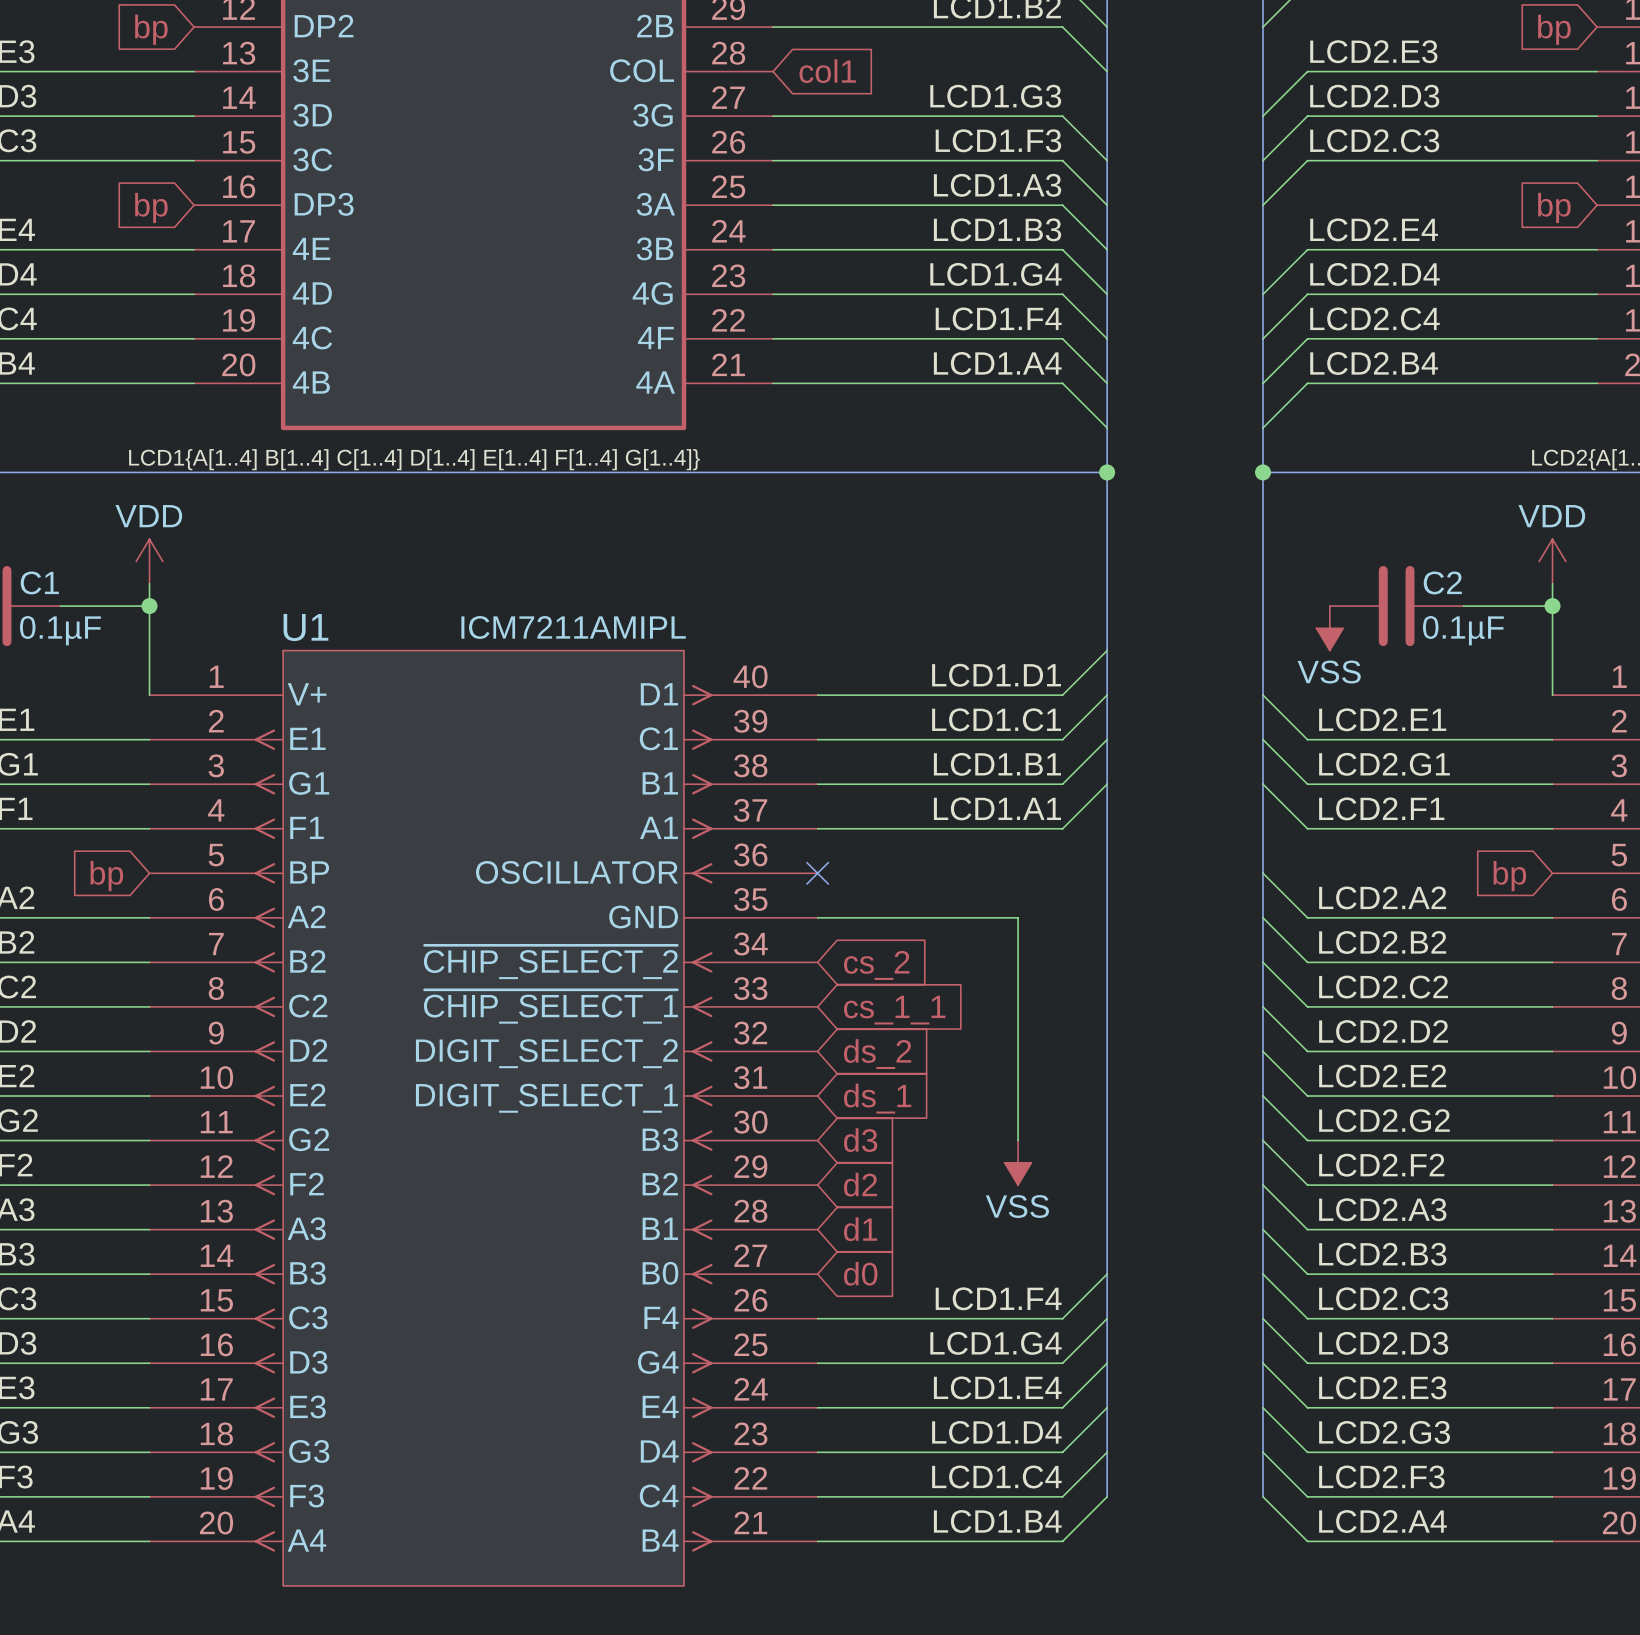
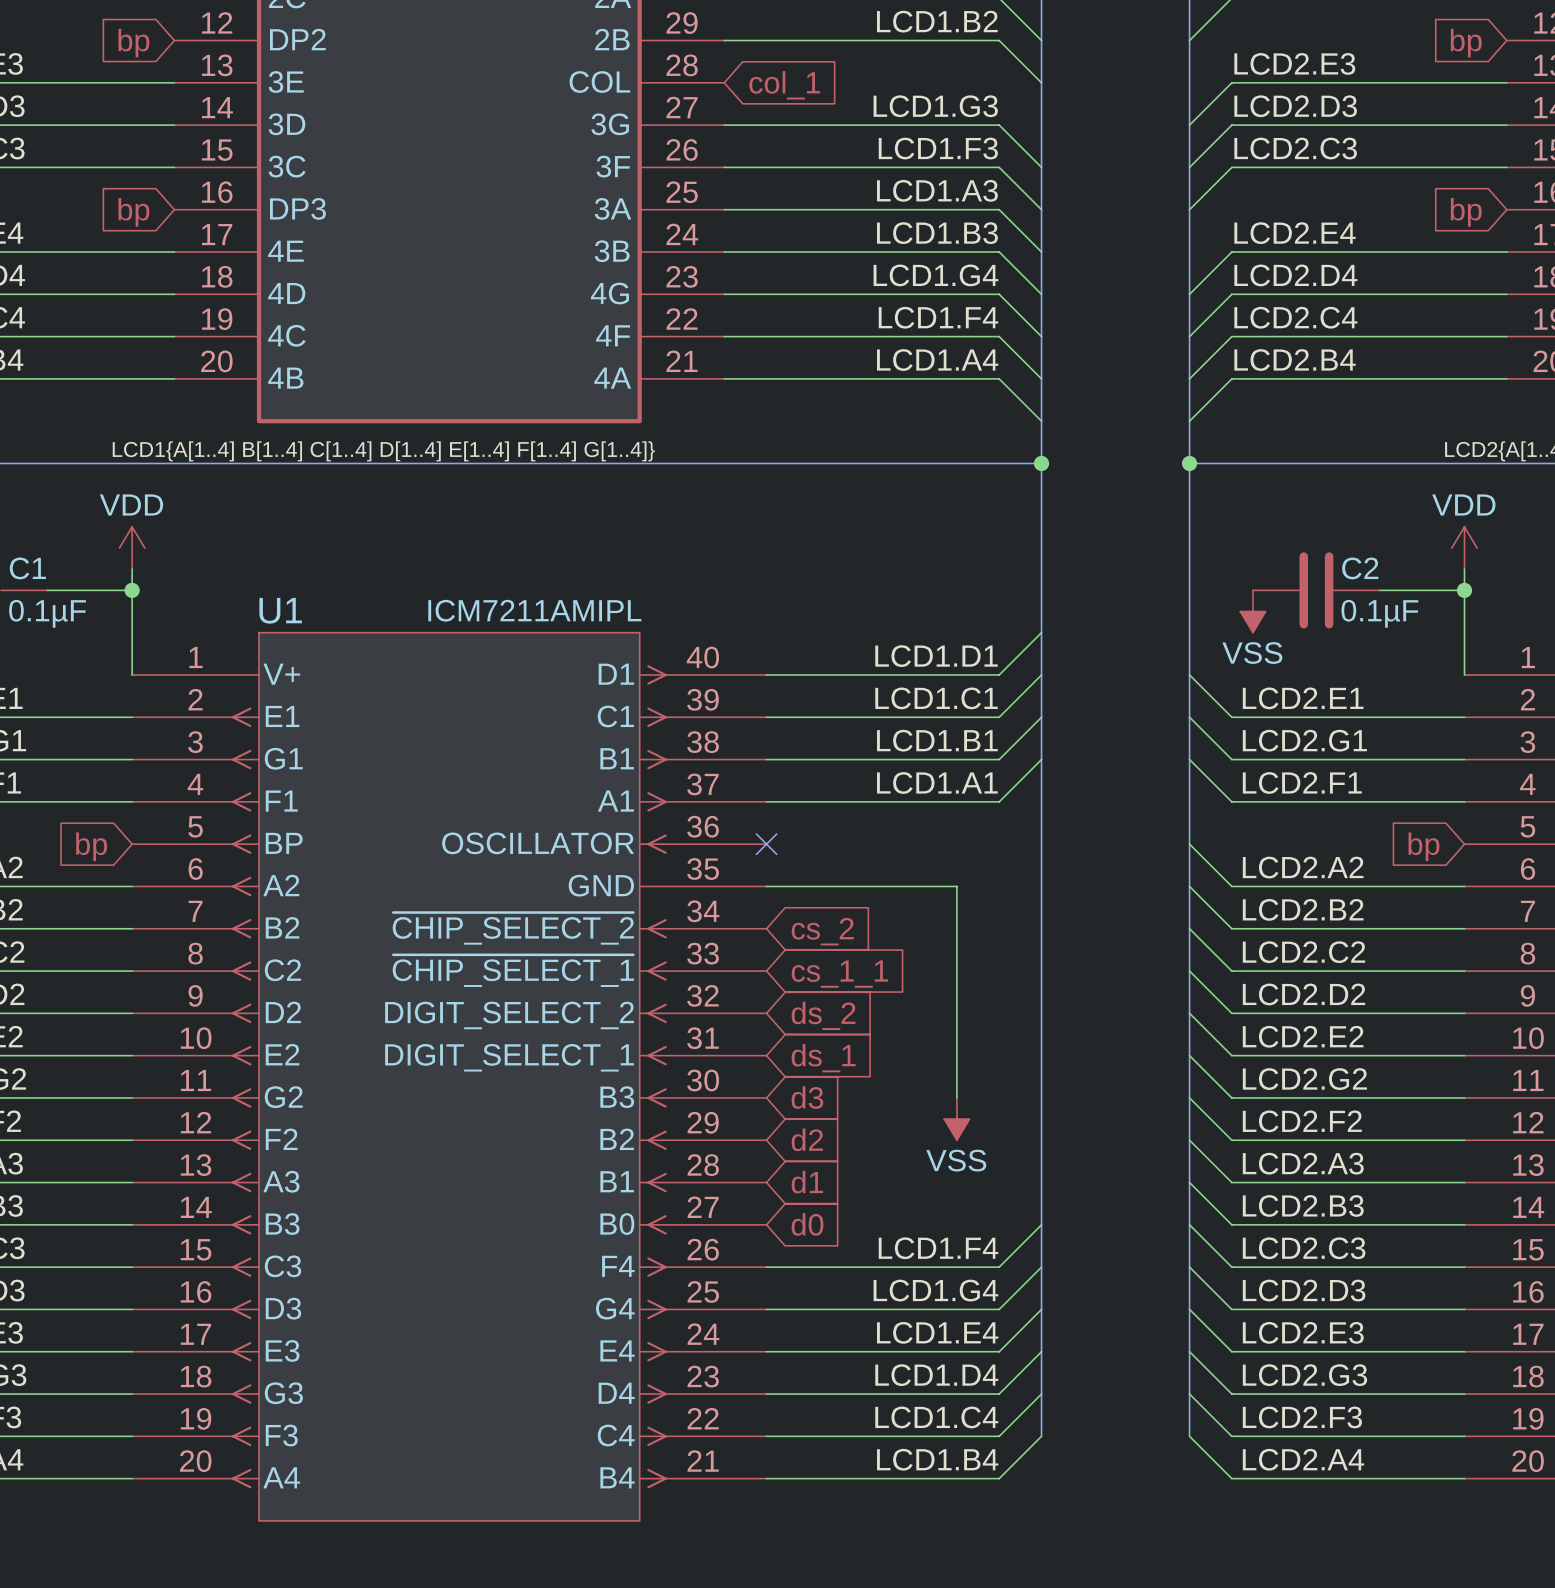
global label: col1 (827, 71) -> col_1 (784, 85)

